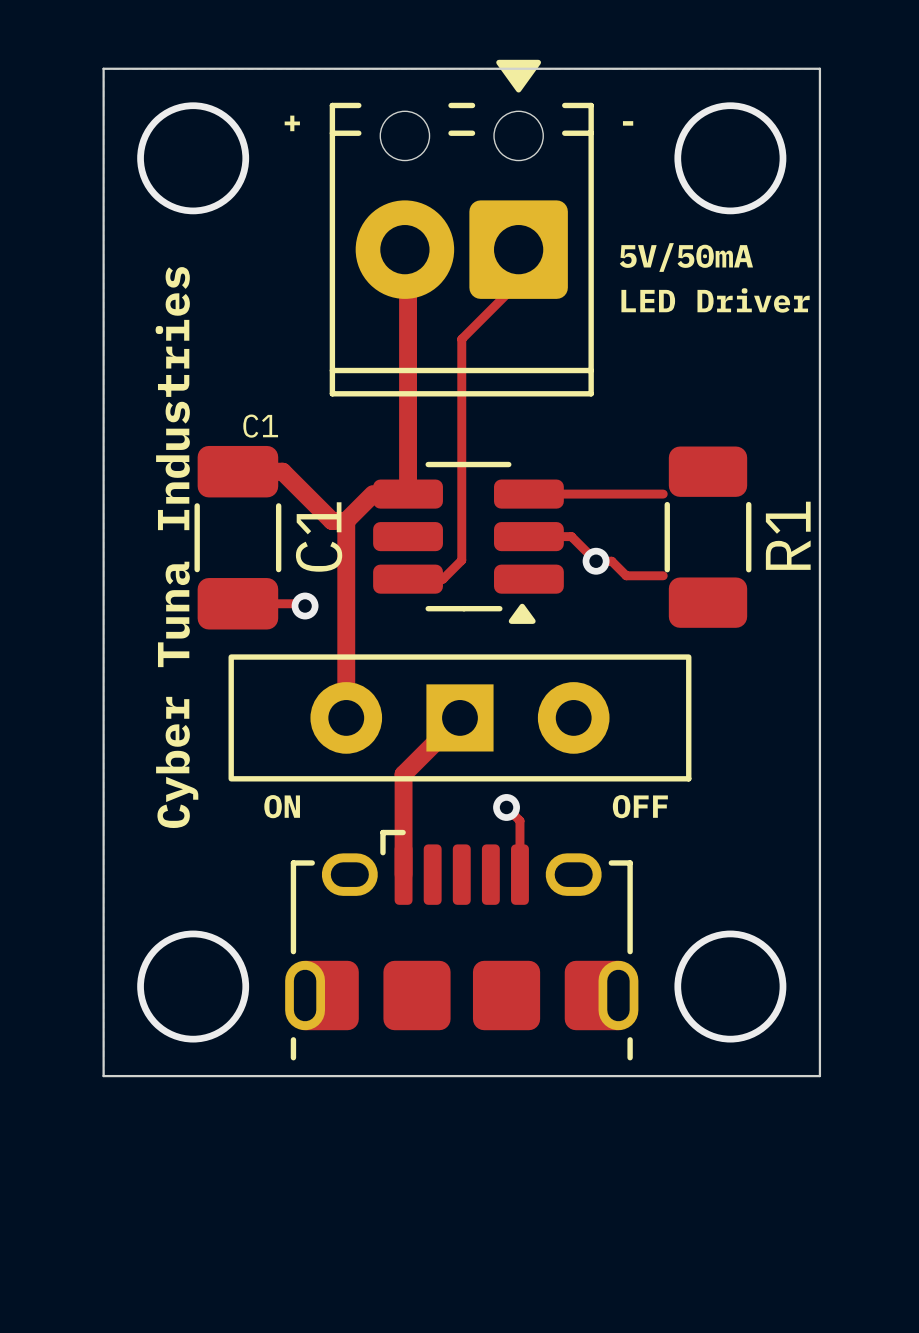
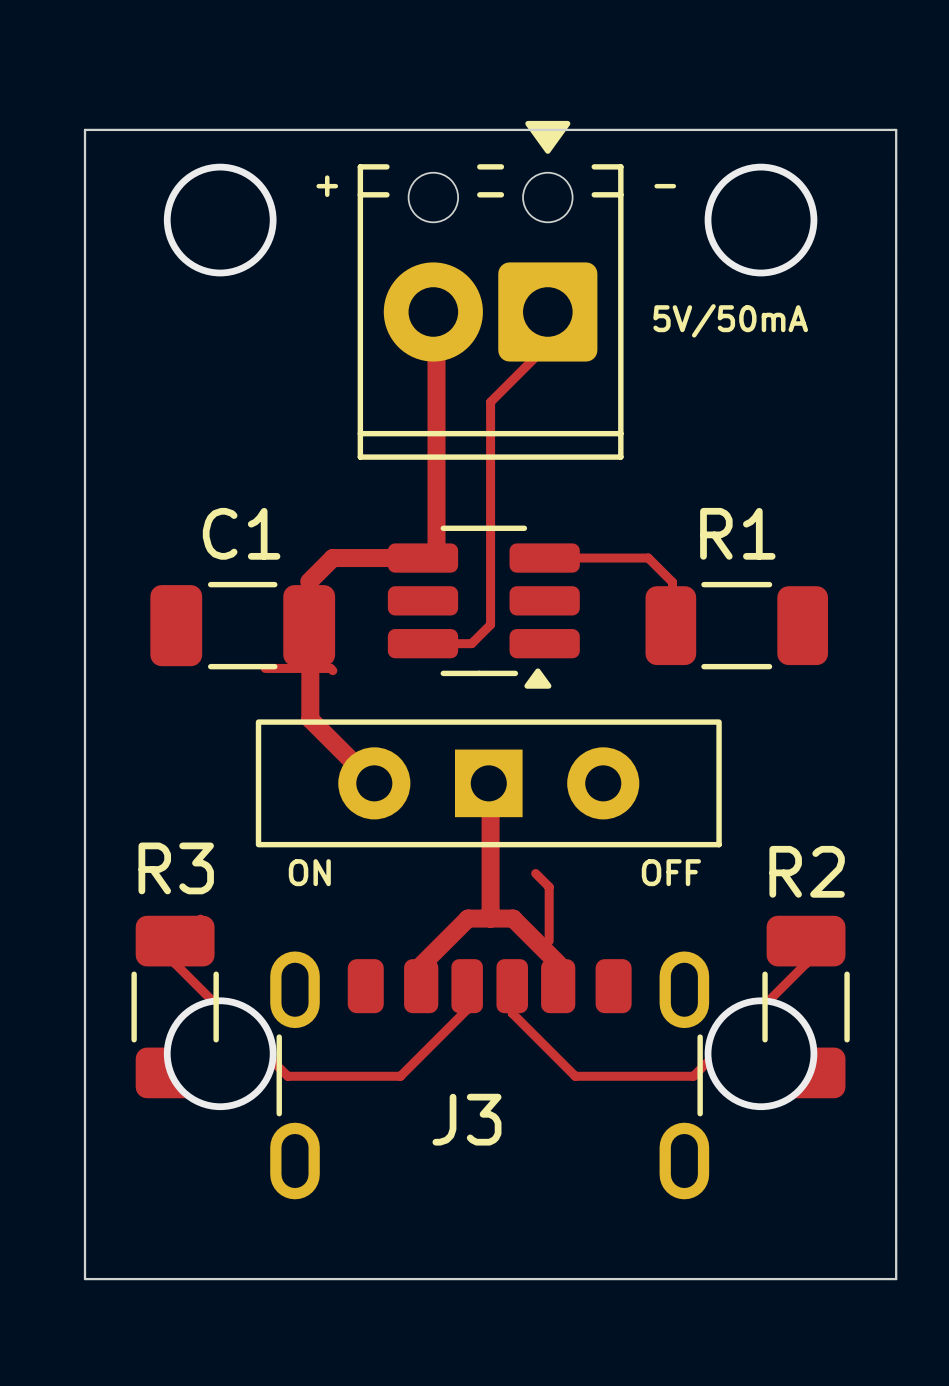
board edge: (103, 68) (103, 1076) (819, 1076) (819, 68) -> (130, 129) (85, 129) (85, 1279) (896, 1279) (896, 129) (851, 129)
text: LED Driver (715, 300) -> none
text: C1 (260, 426) -> none
top track: (237, 471) (282, 471) (331, 520) (346, 520) -> none
top track: (373, 494) (346, 520) -> none
top track: (618, 494) (663, 494) -> (648, 558) (672, 582) (672, 625)
top track: (346, 520) (346, 717) -> (401, 558) (332, 558) (309, 581) (310, 719) (374, 783)
R1 name position: R1 (788, 535) -> R1 (737, 533)
C1 name position: C1 (319, 536) -> C1 (241, 533)
top track: (528, 536) (571, 536) (596, 561) (611, 561) (626, 575) (663, 575) -> none
C1 rotation: 0° (237, 537) -> 90° clockwise (242, 625)
R1 rotation: 0° (708, 537) -> 90° clockwise (736, 625)
part position: (468, 542) -> (483, 607)
text: Cyber Tuna Industries (176, 547) -> none
via: (596, 561) -> none
via: (305, 606) -> none
top track: (459, 717) (403, 774) (403, 874) -> (488, 783) (490, 785) (490, 918)
via: (506, 807) -> none
top track: none -> (175, 941) (175, 963) (287, 1076) (400, 1076) (467, 1009) (467, 986)
top track: none -> (806, 941) (806, 963) (693, 1076) (575, 1076) (512, 1013) (512, 986)
top track: none -> (421, 986) (421, 965) (468, 918) (513, 918) (558, 963) (558, 986)
R3: none -> (175, 1007)
R2: none -> (806, 1007)
part: (461, 945) -> none
J3: none -> (489, 1075)

